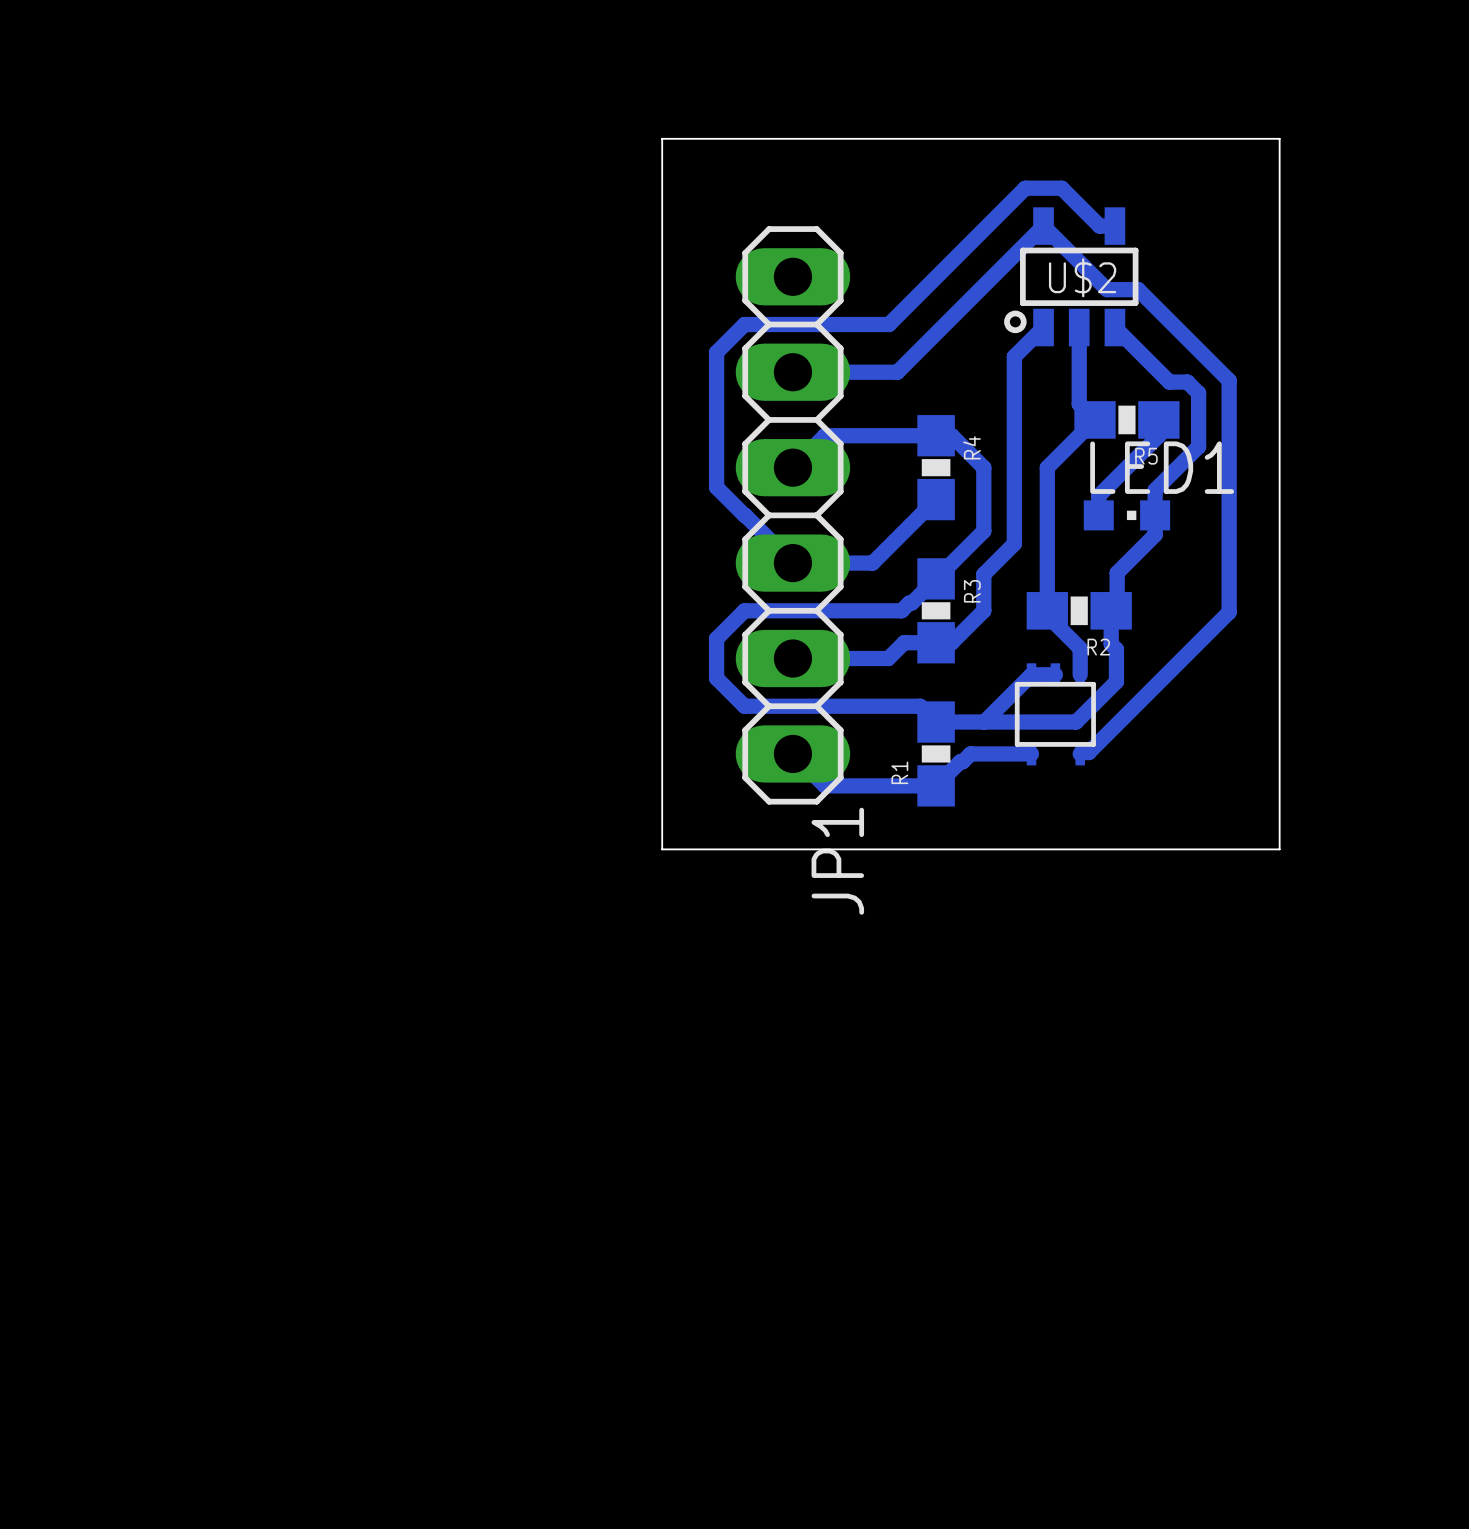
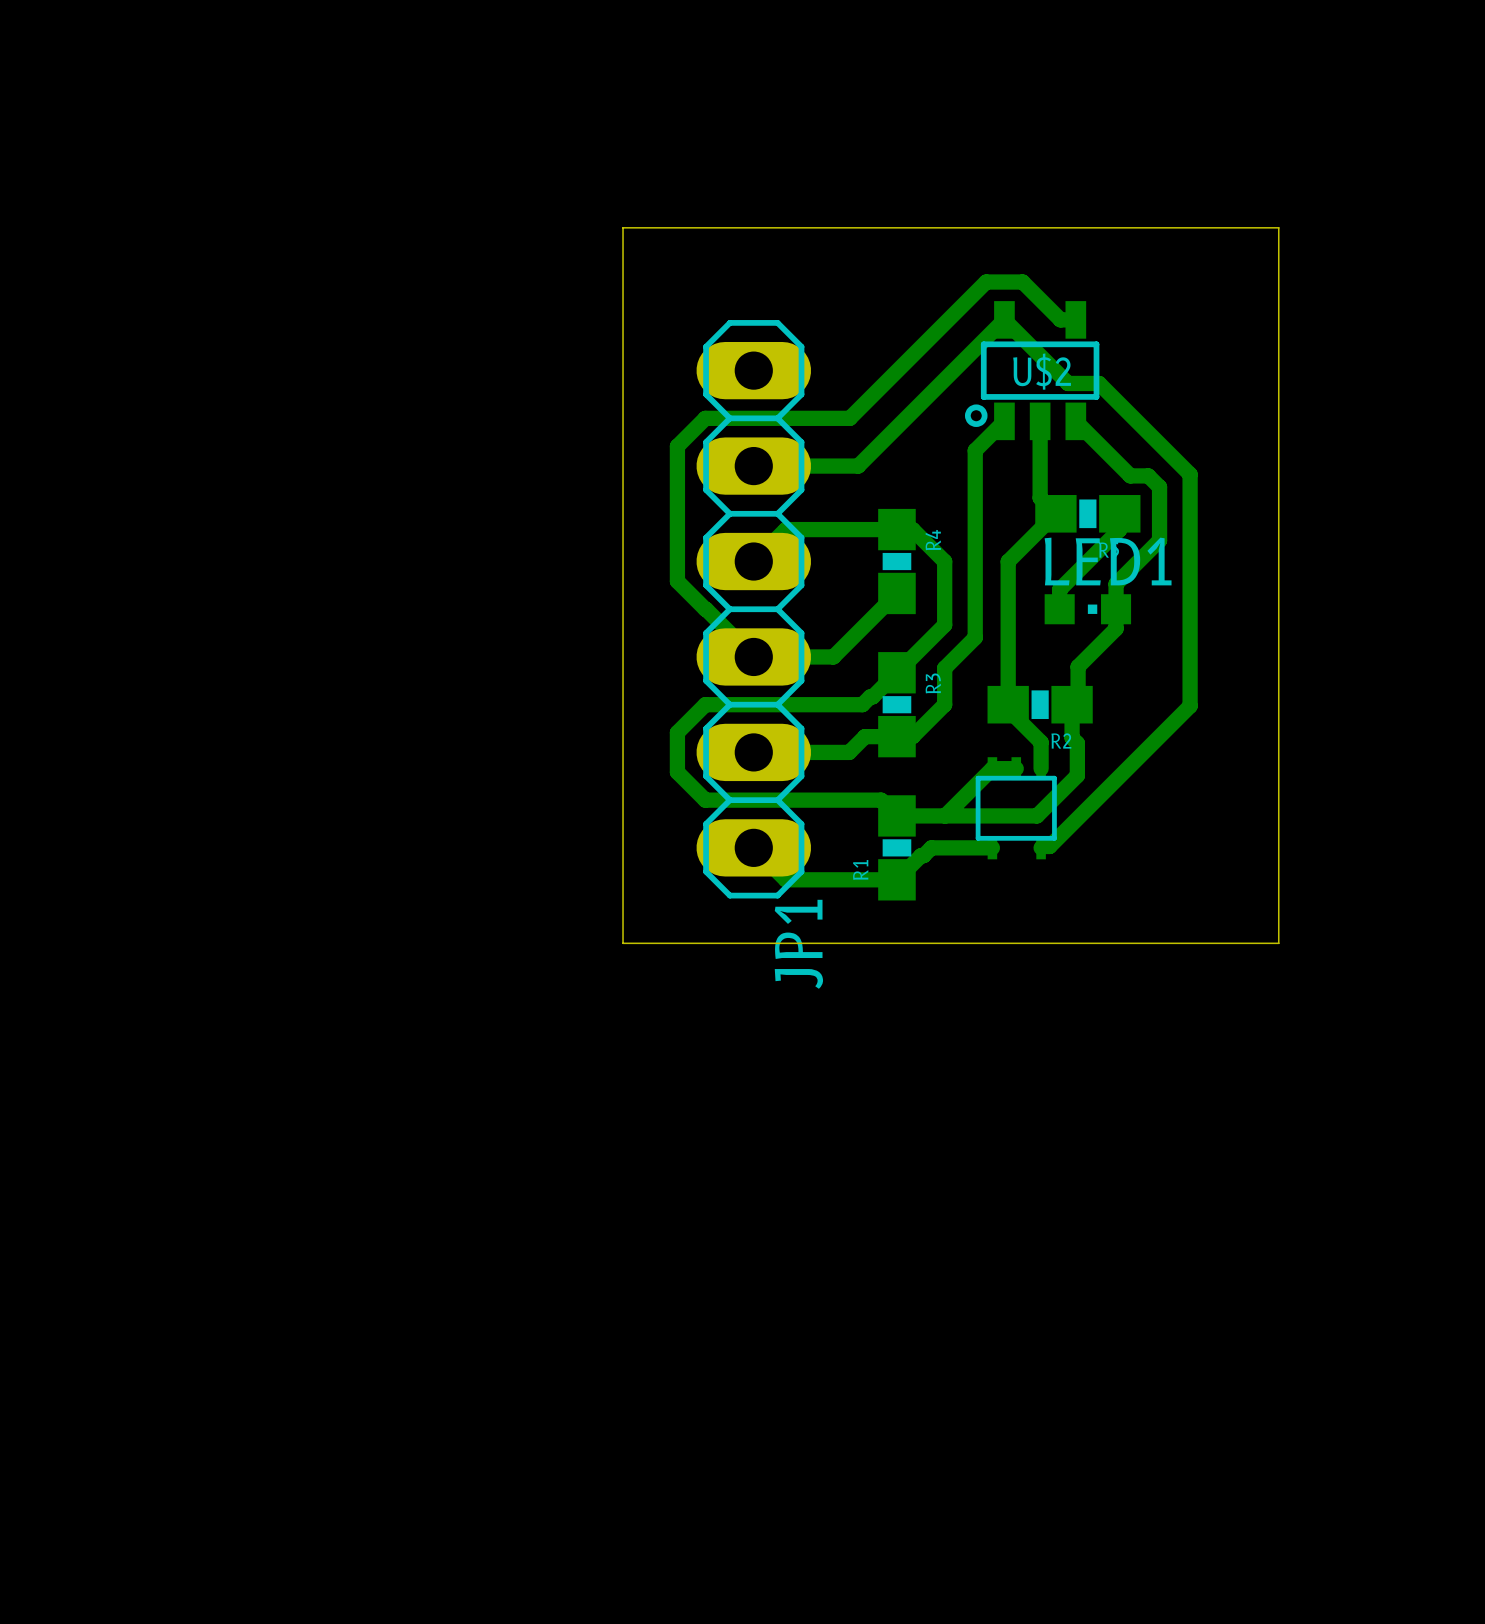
board edge: (662, 138) (1279, 138) (1279, 849) -> (623, 232) (623, 227) (1278, 227) (1278, 943) (1240, 943)

